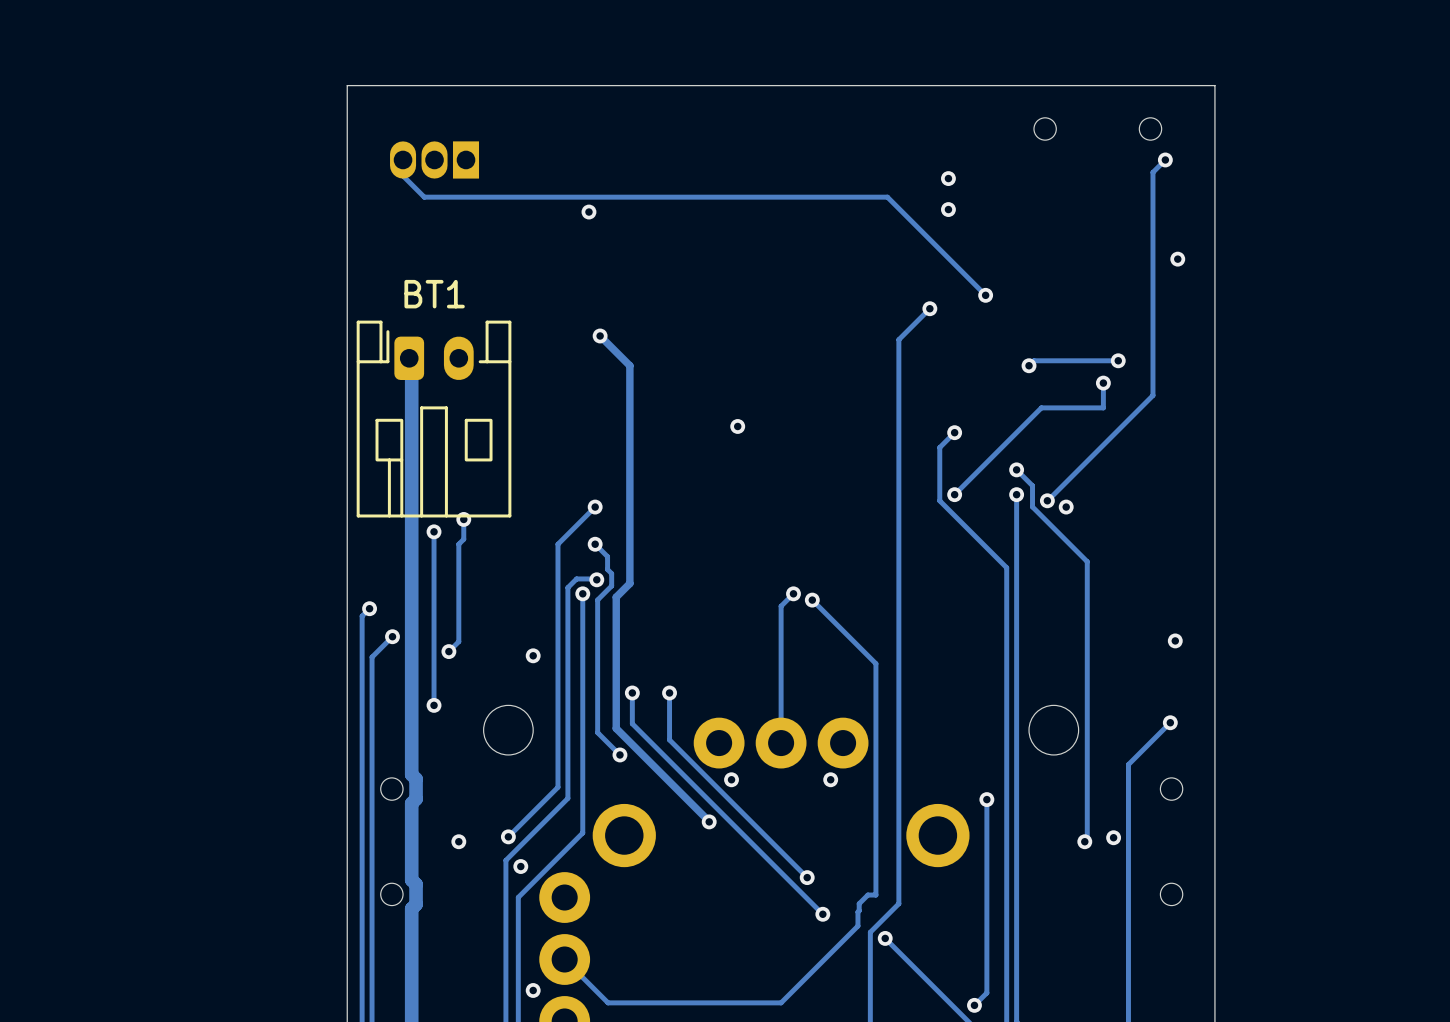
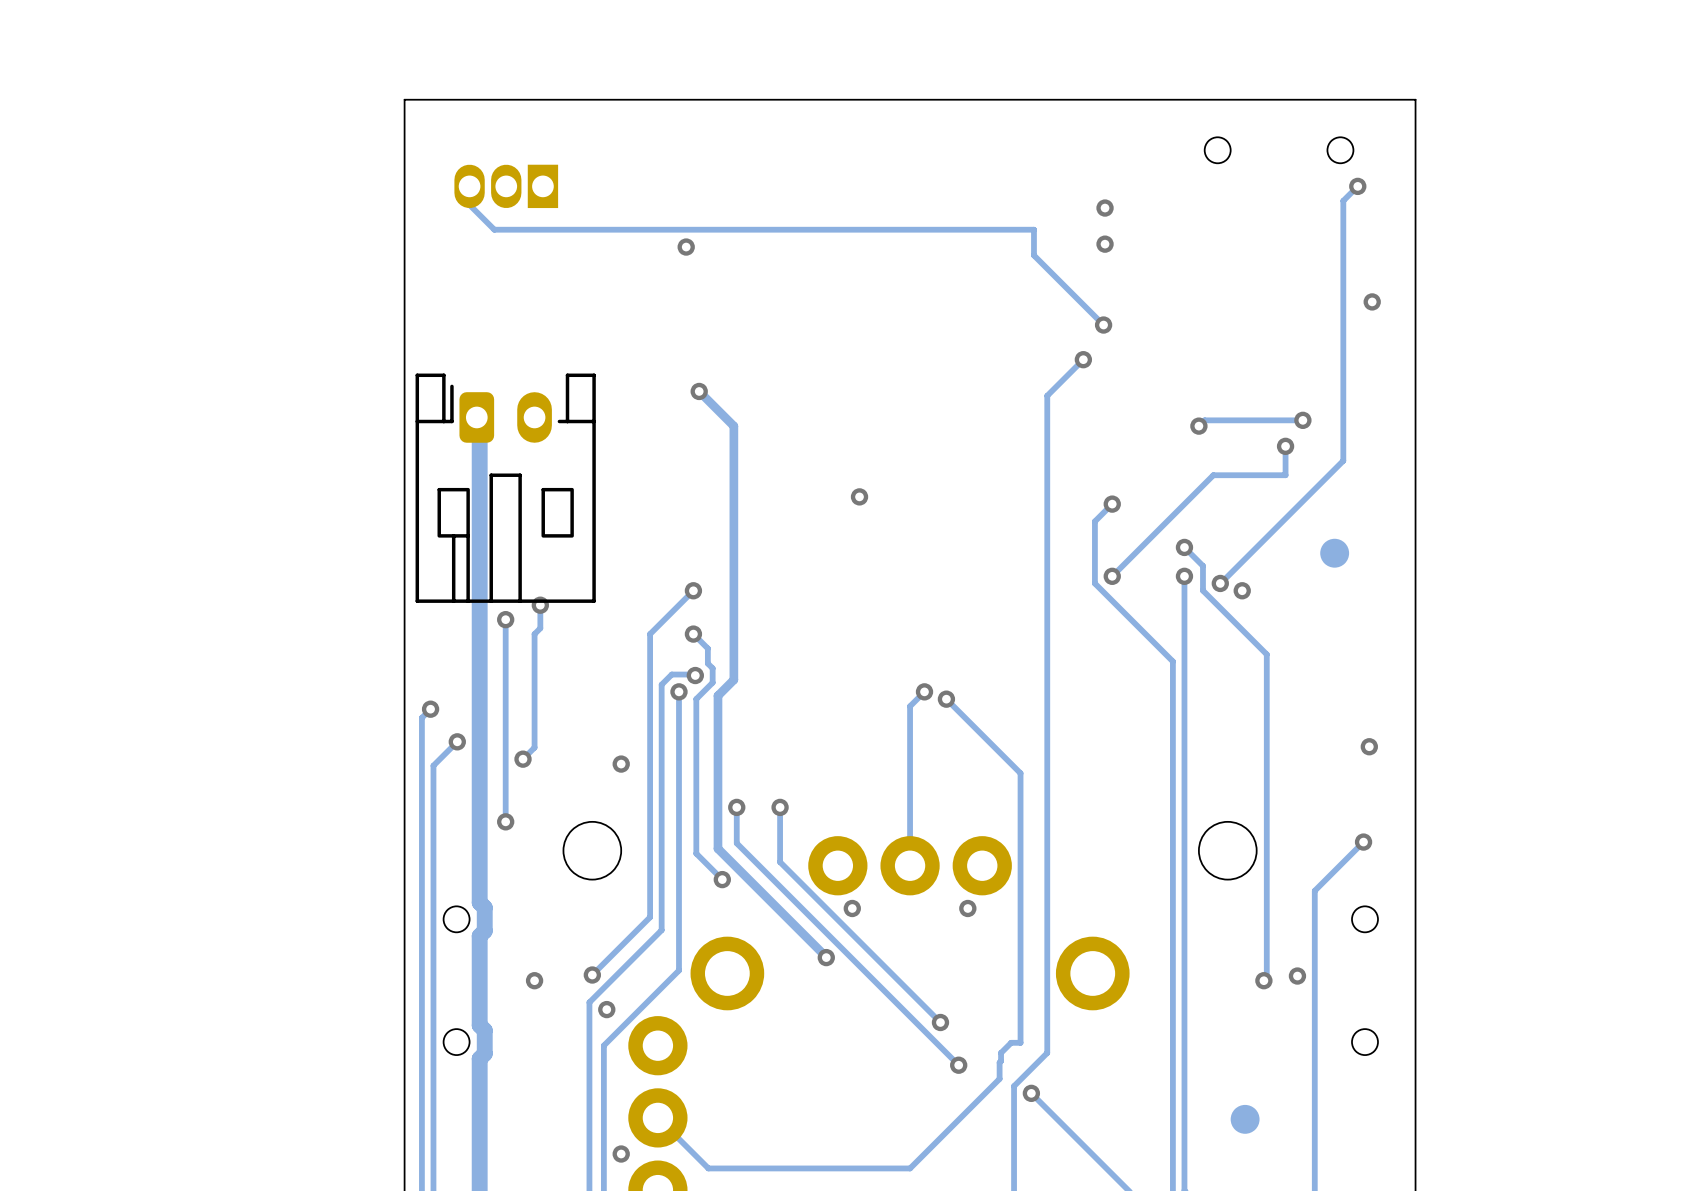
track: (887, 197) (985, 295) -> (1033, 229) (1033, 255) (1103, 325)
BT1 name: BT1 (434, 294) -> none
via position: (985, 295) -> (1103, 325)
part: none -> (1334, 553)
track: (986, 799) (986, 992) (974, 1005) -> none
via: (986, 799) -> none
part: none -> (1245, 1119)
via: (974, 1005) -> none

